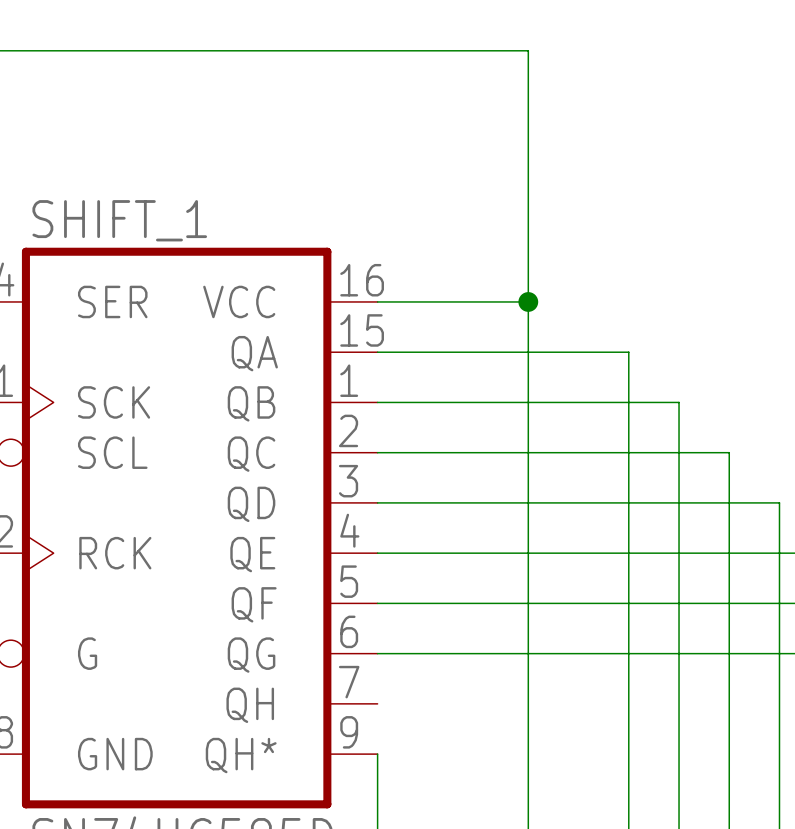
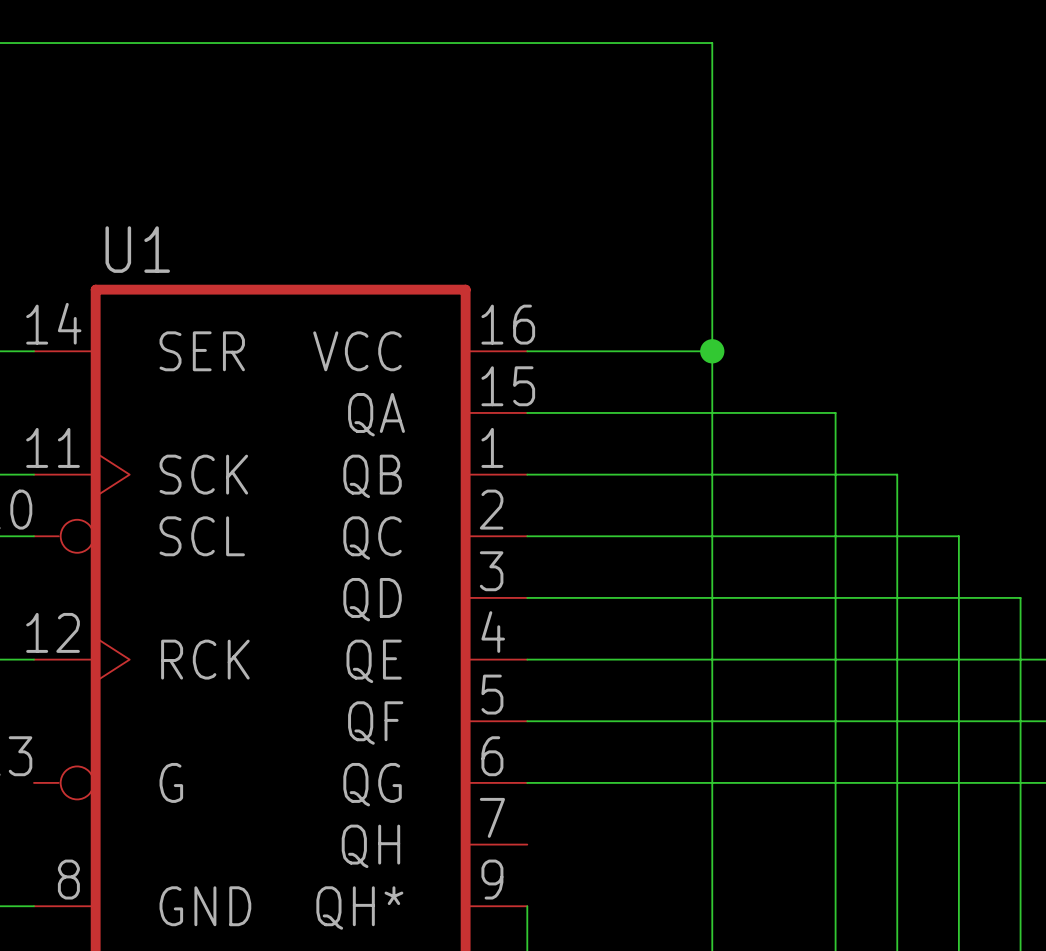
SHIFT_1 name: SHIFT_1 (119, 220) -> U1 (137, 249)

